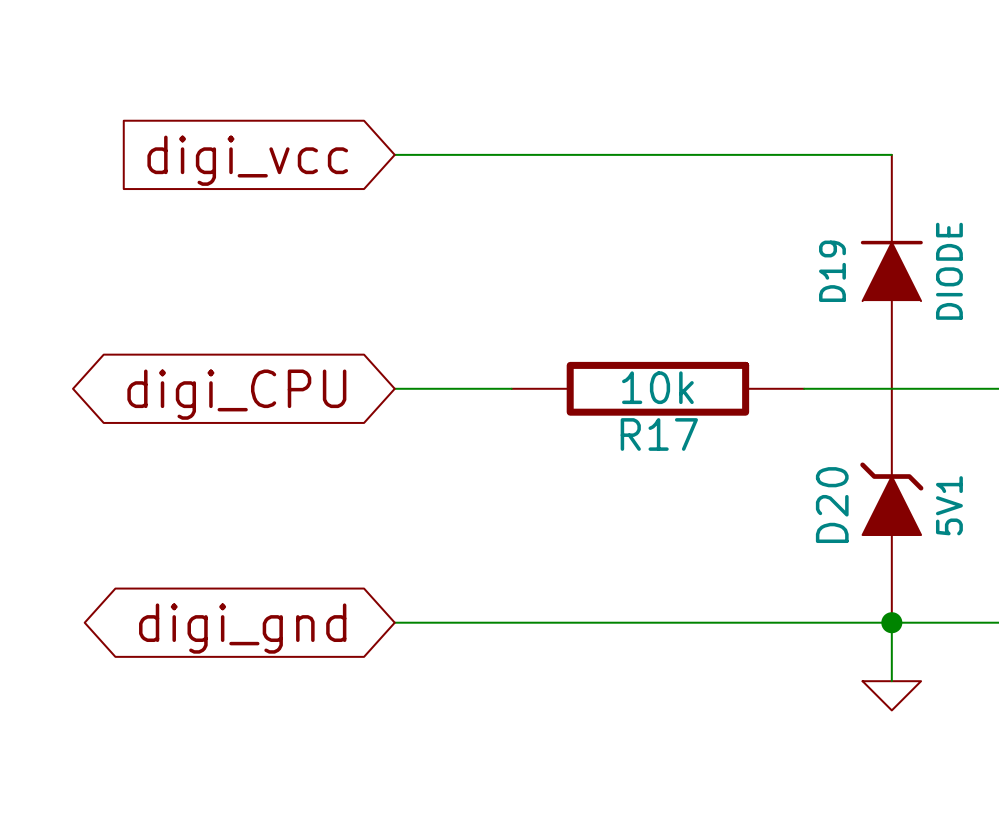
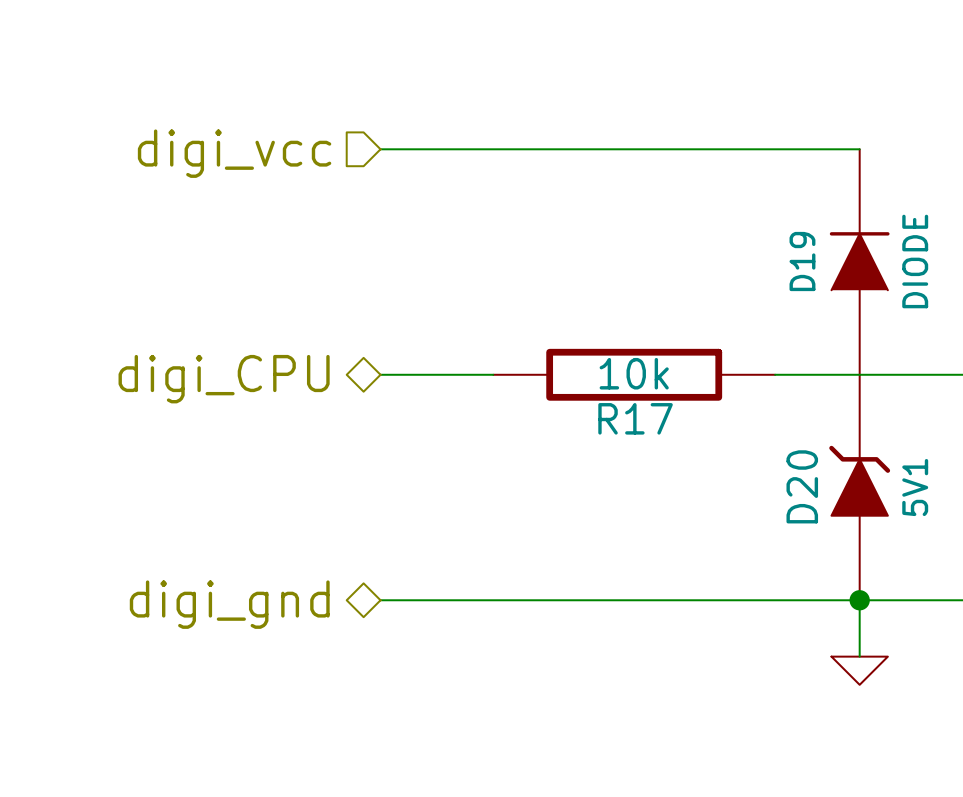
hierarchical label: none -> digi_vcc (234, 153)
global label: digi_vcc (247, 160) -> none
hierarchical label: none -> digi_CPU (224, 379)
global label: digi_CPU (236, 394) -> none
hierarchical label: none -> digi_gnd (229, 604)
global label: digi_gnd (242, 628) -> none

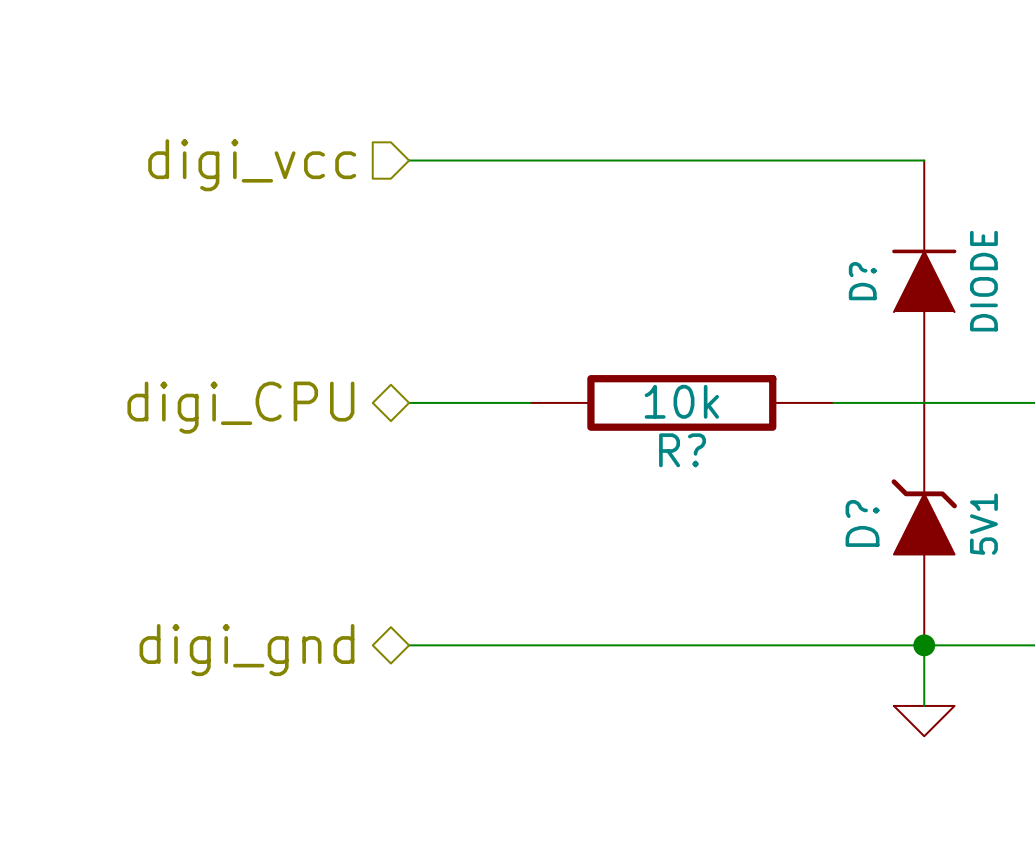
D19 name: D19 (802, 261) -> D? (862, 281)
R17 name: R17 (635, 418) -> R? (682, 450)
D20 name: D20 (802, 486) -> D? (862, 523)

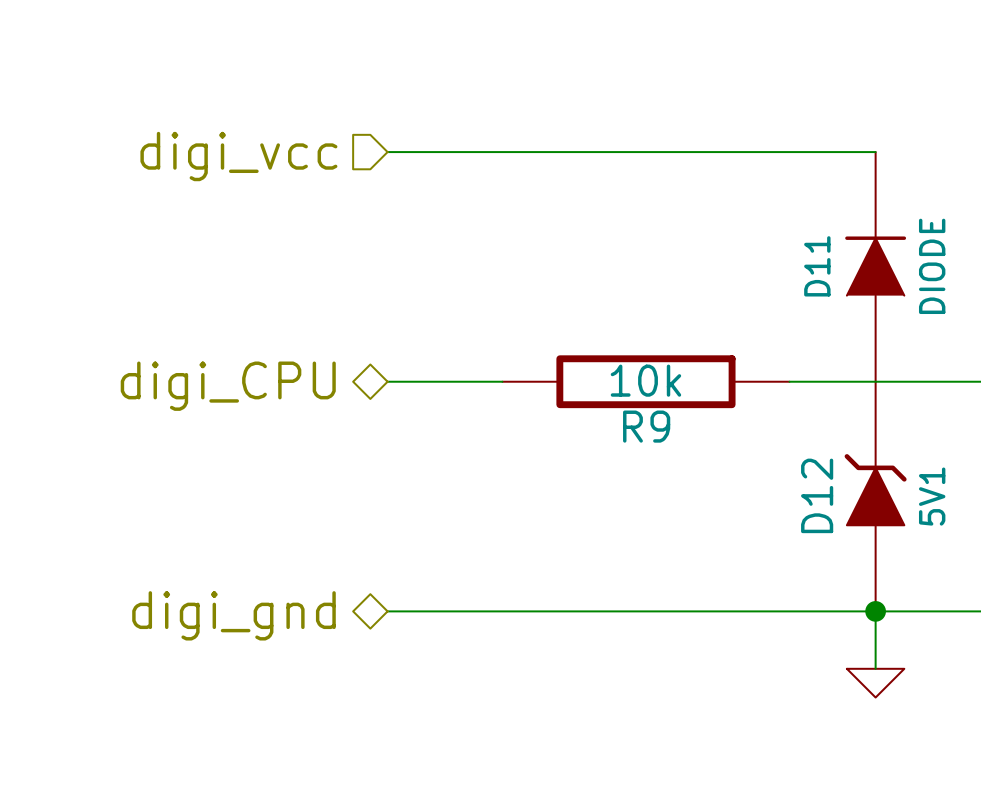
D? name: D? (862, 281) -> D11 (817, 266)
R? name: R? (682, 450) -> R9 (646, 426)
D? name: D? (862, 523) -> D12 (817, 495)

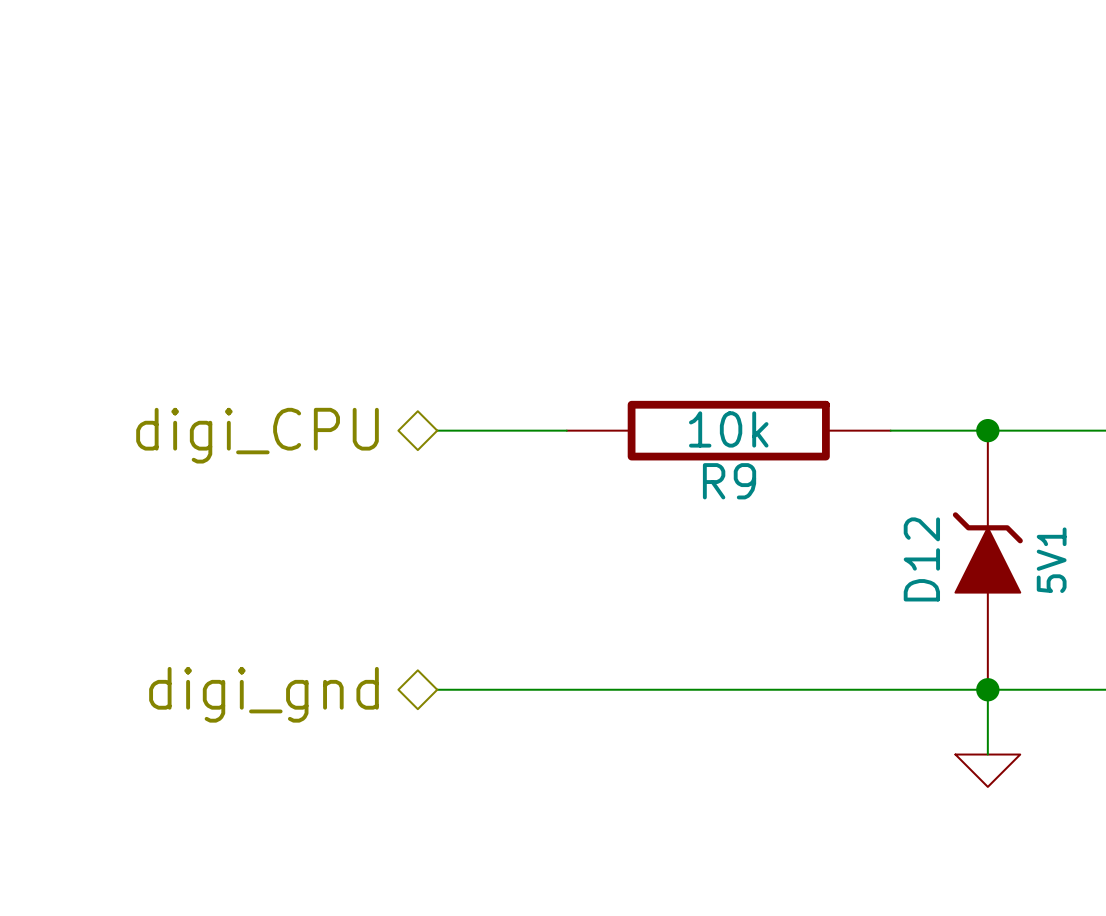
wire: (387, 152) (875, 152) -> none
hierarchical label: digi_vcc (238, 156) -> none
D11: DIODE (875, 266) -> none
junction: none -> (987, 430)

